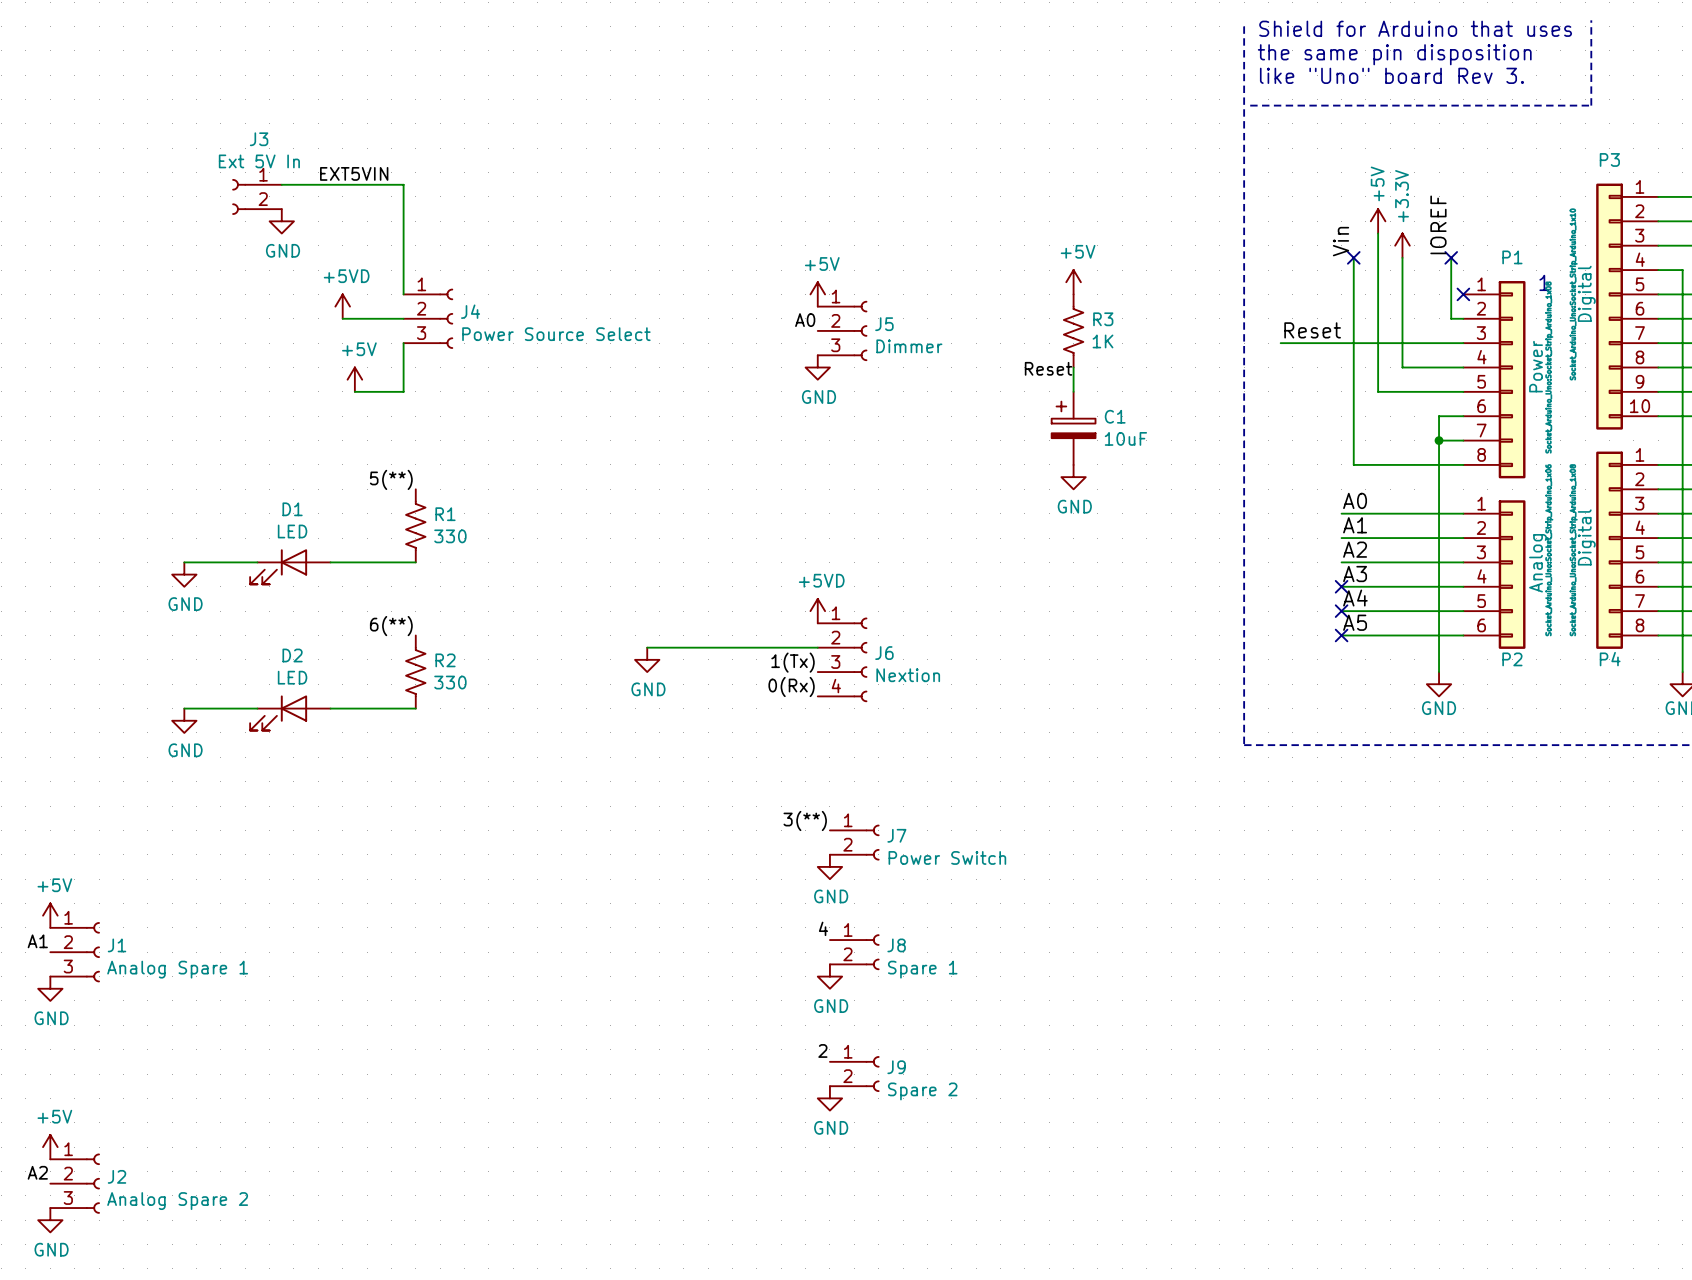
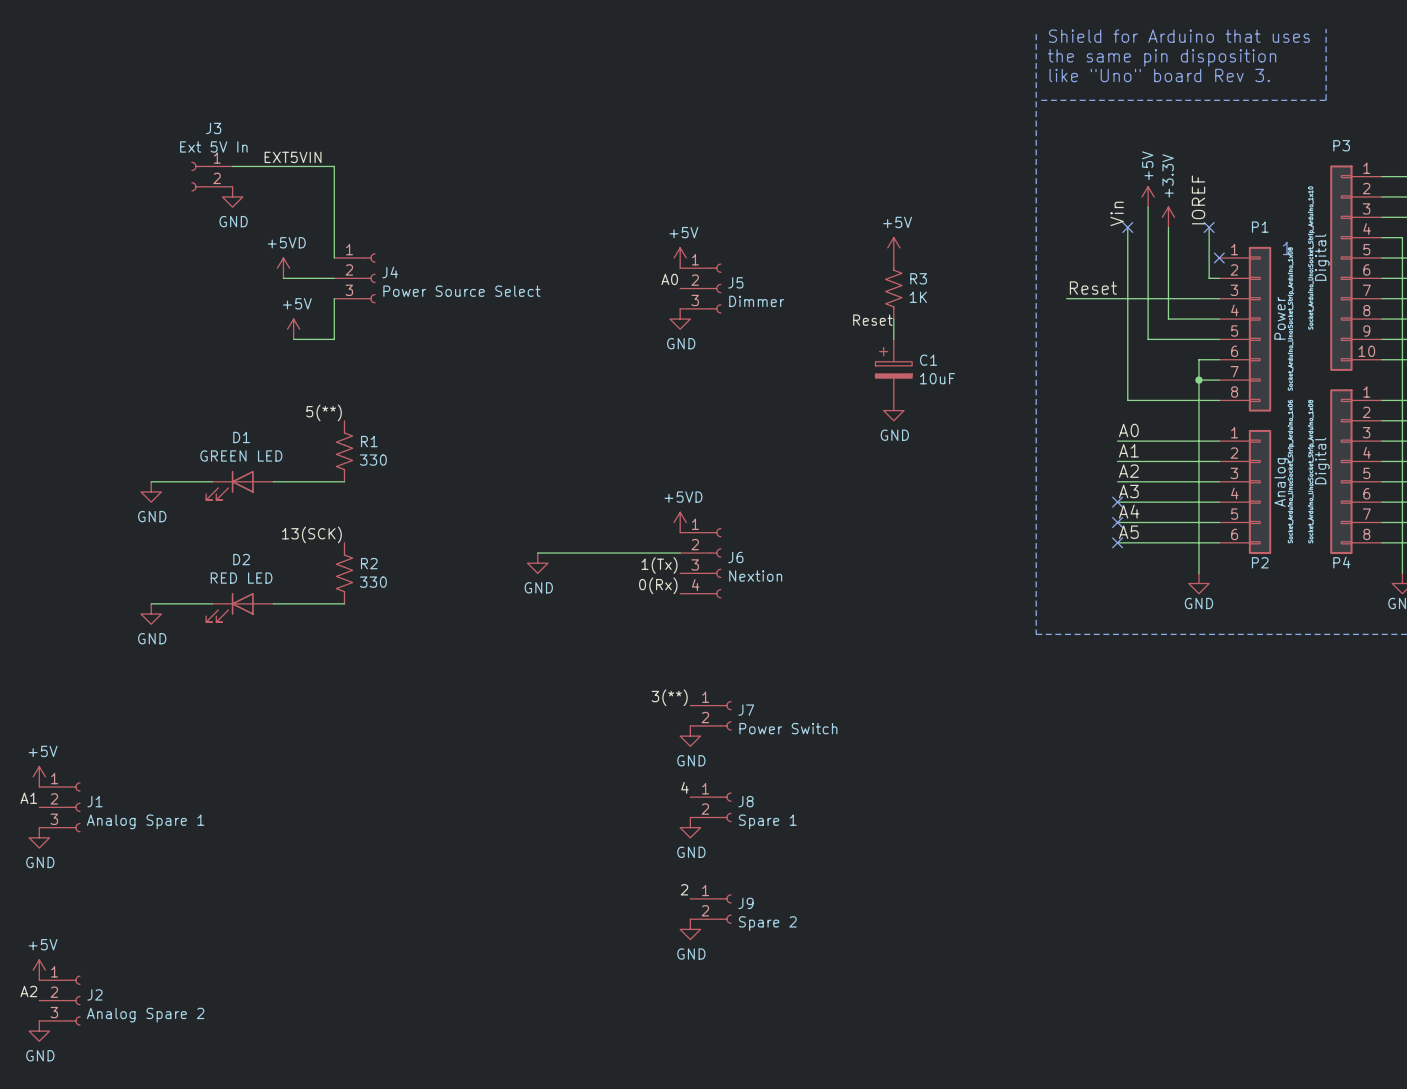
D1 value: LED (292, 531) -> GREEN LED (241, 455)
label: 6(**) (391, 626) -> 13(SCK) (311, 534)
D2 value: LED (292, 677) -> RED LED (241, 578)

